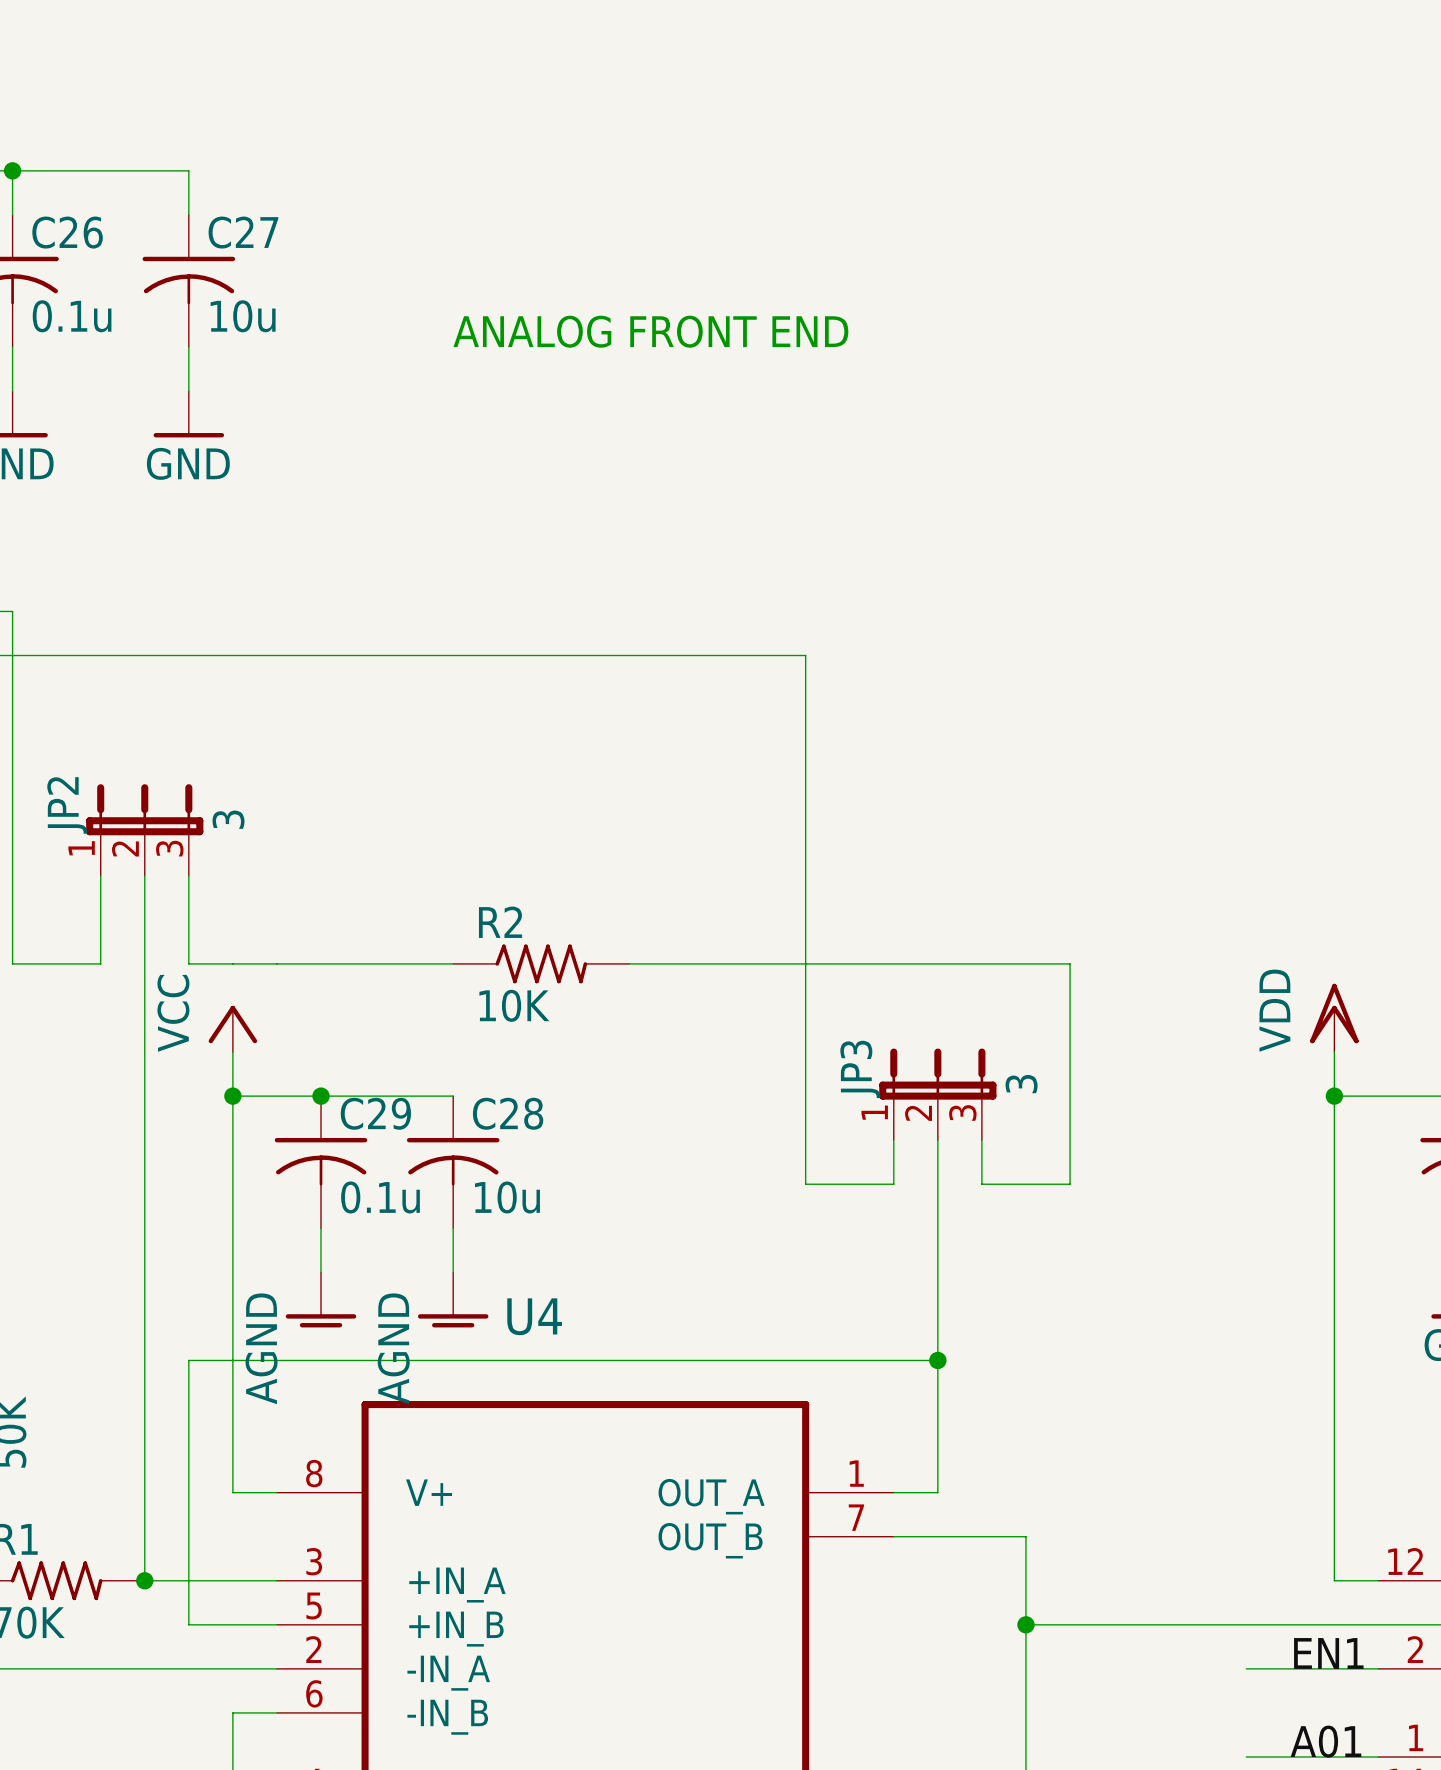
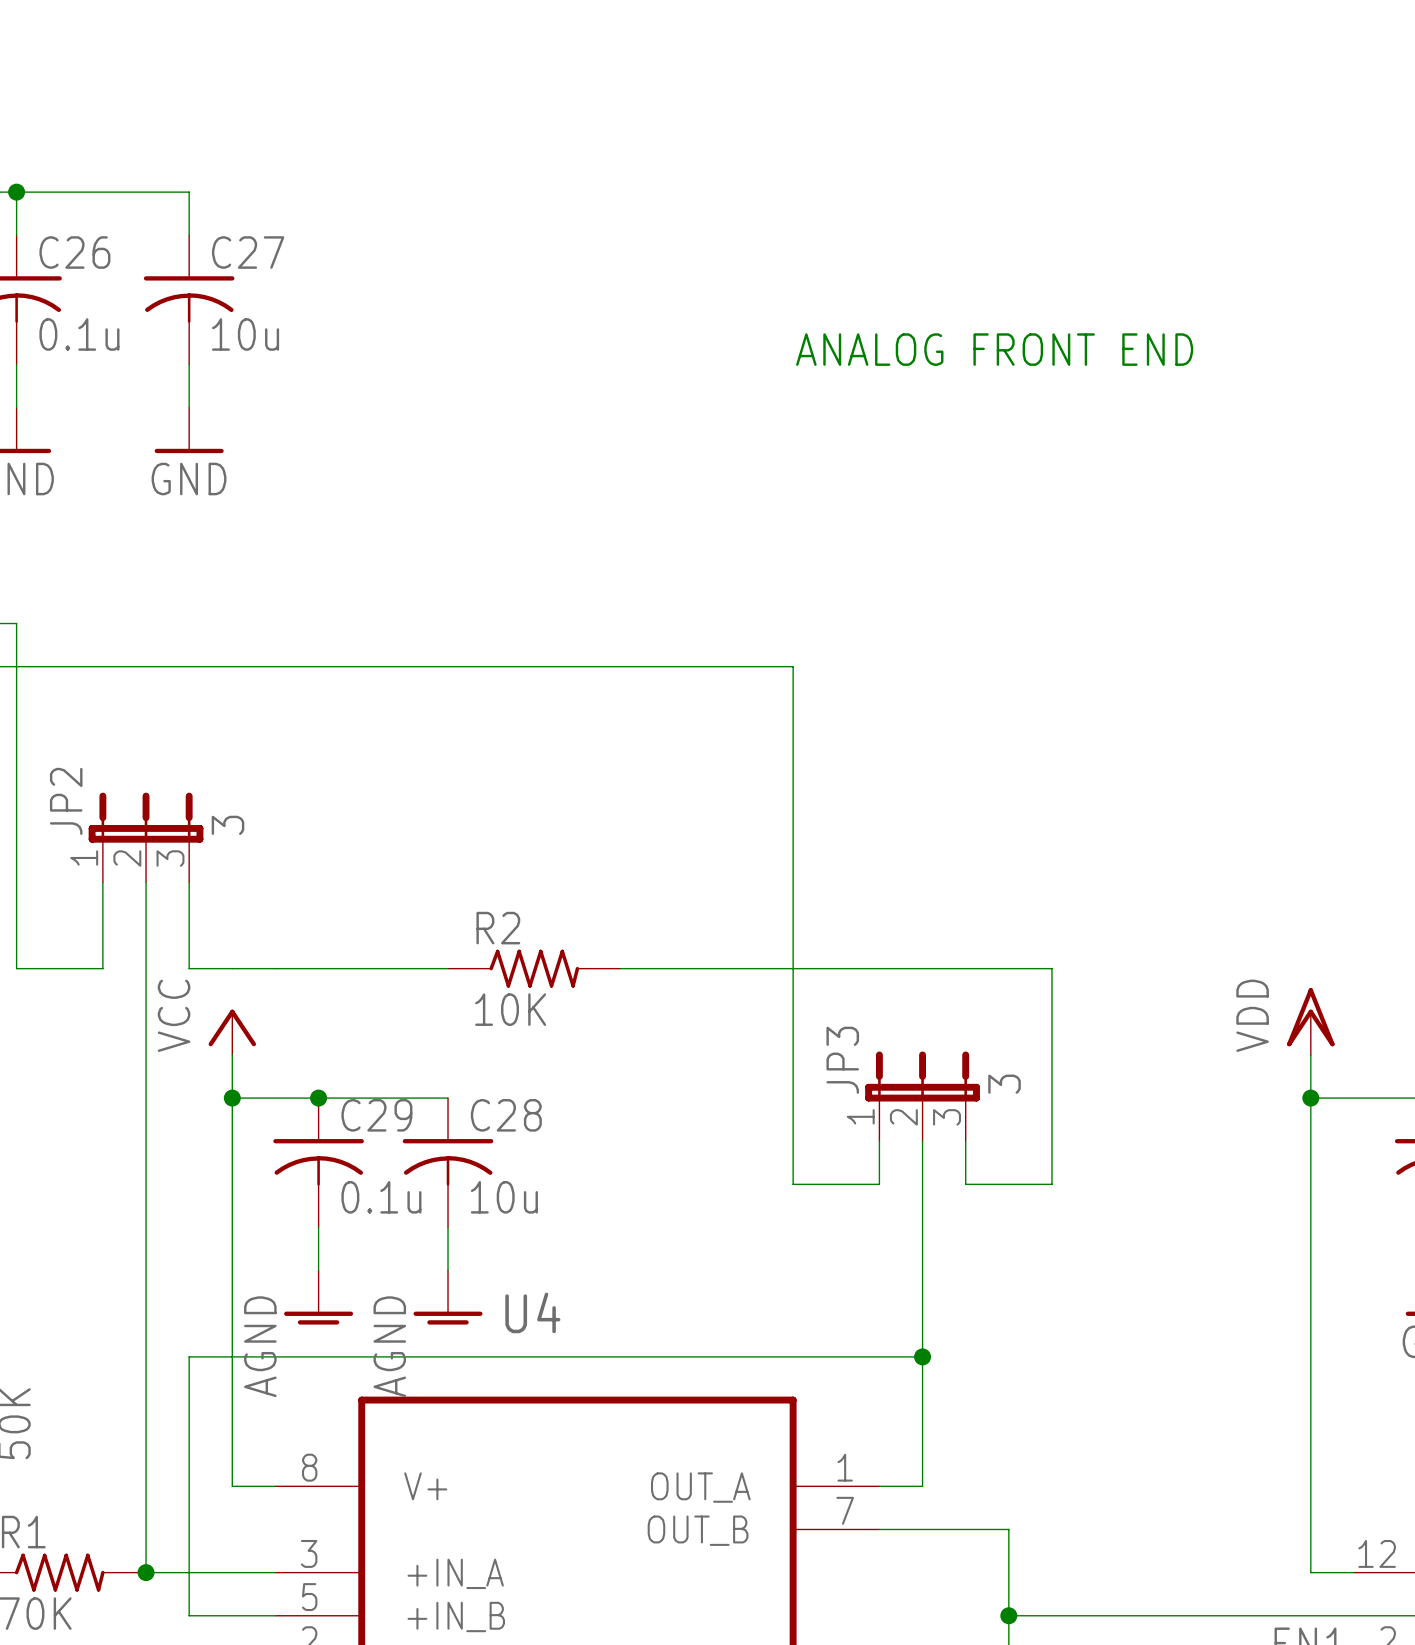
text position: ANALOG FRONT END (650, 331) -> ANALOG FRONT END (994, 349)

